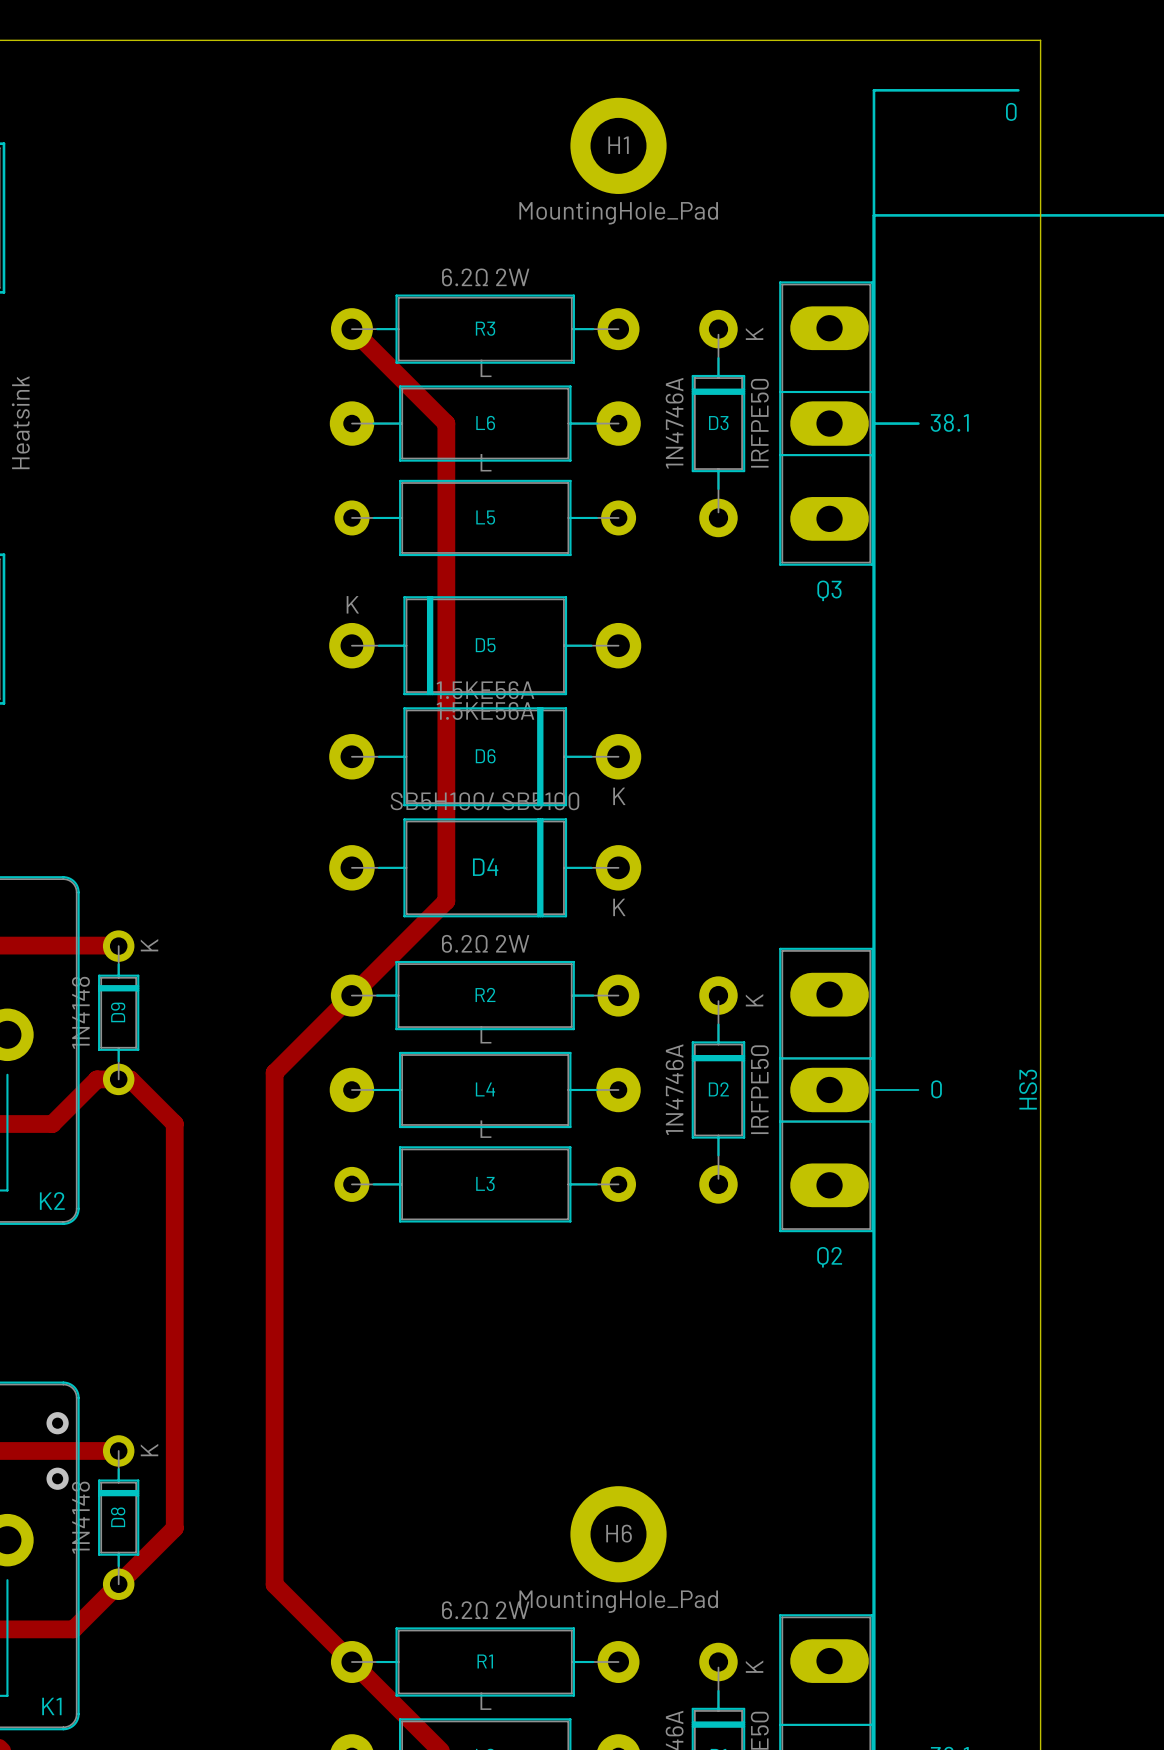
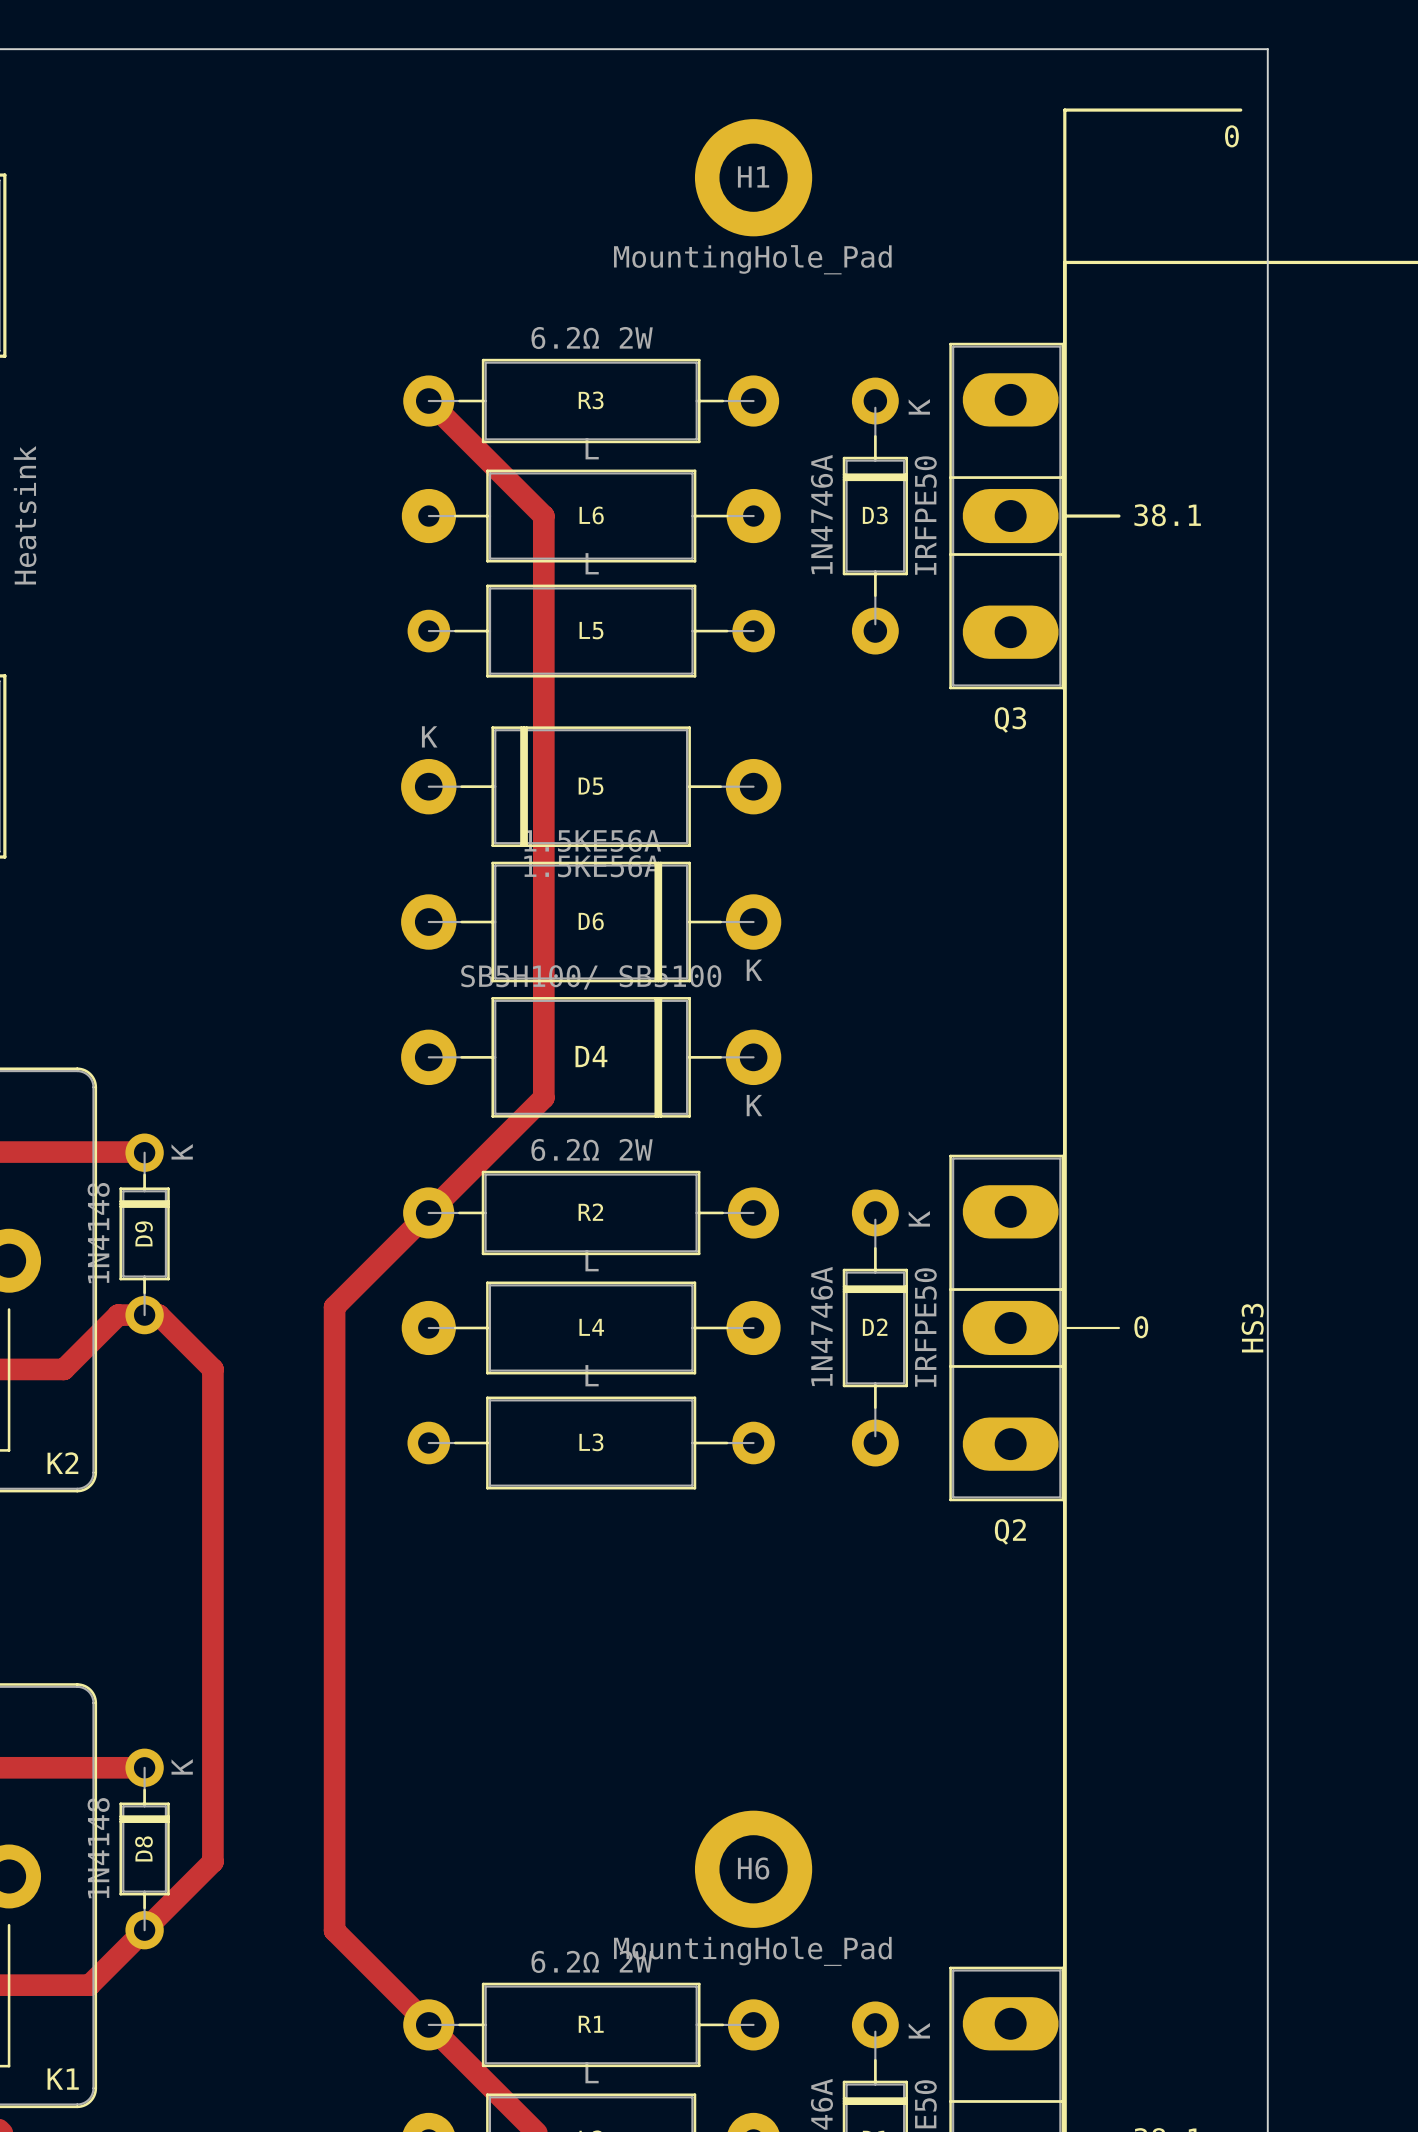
via: (57, 1423) -> none
via: (57, 1478) -> none

